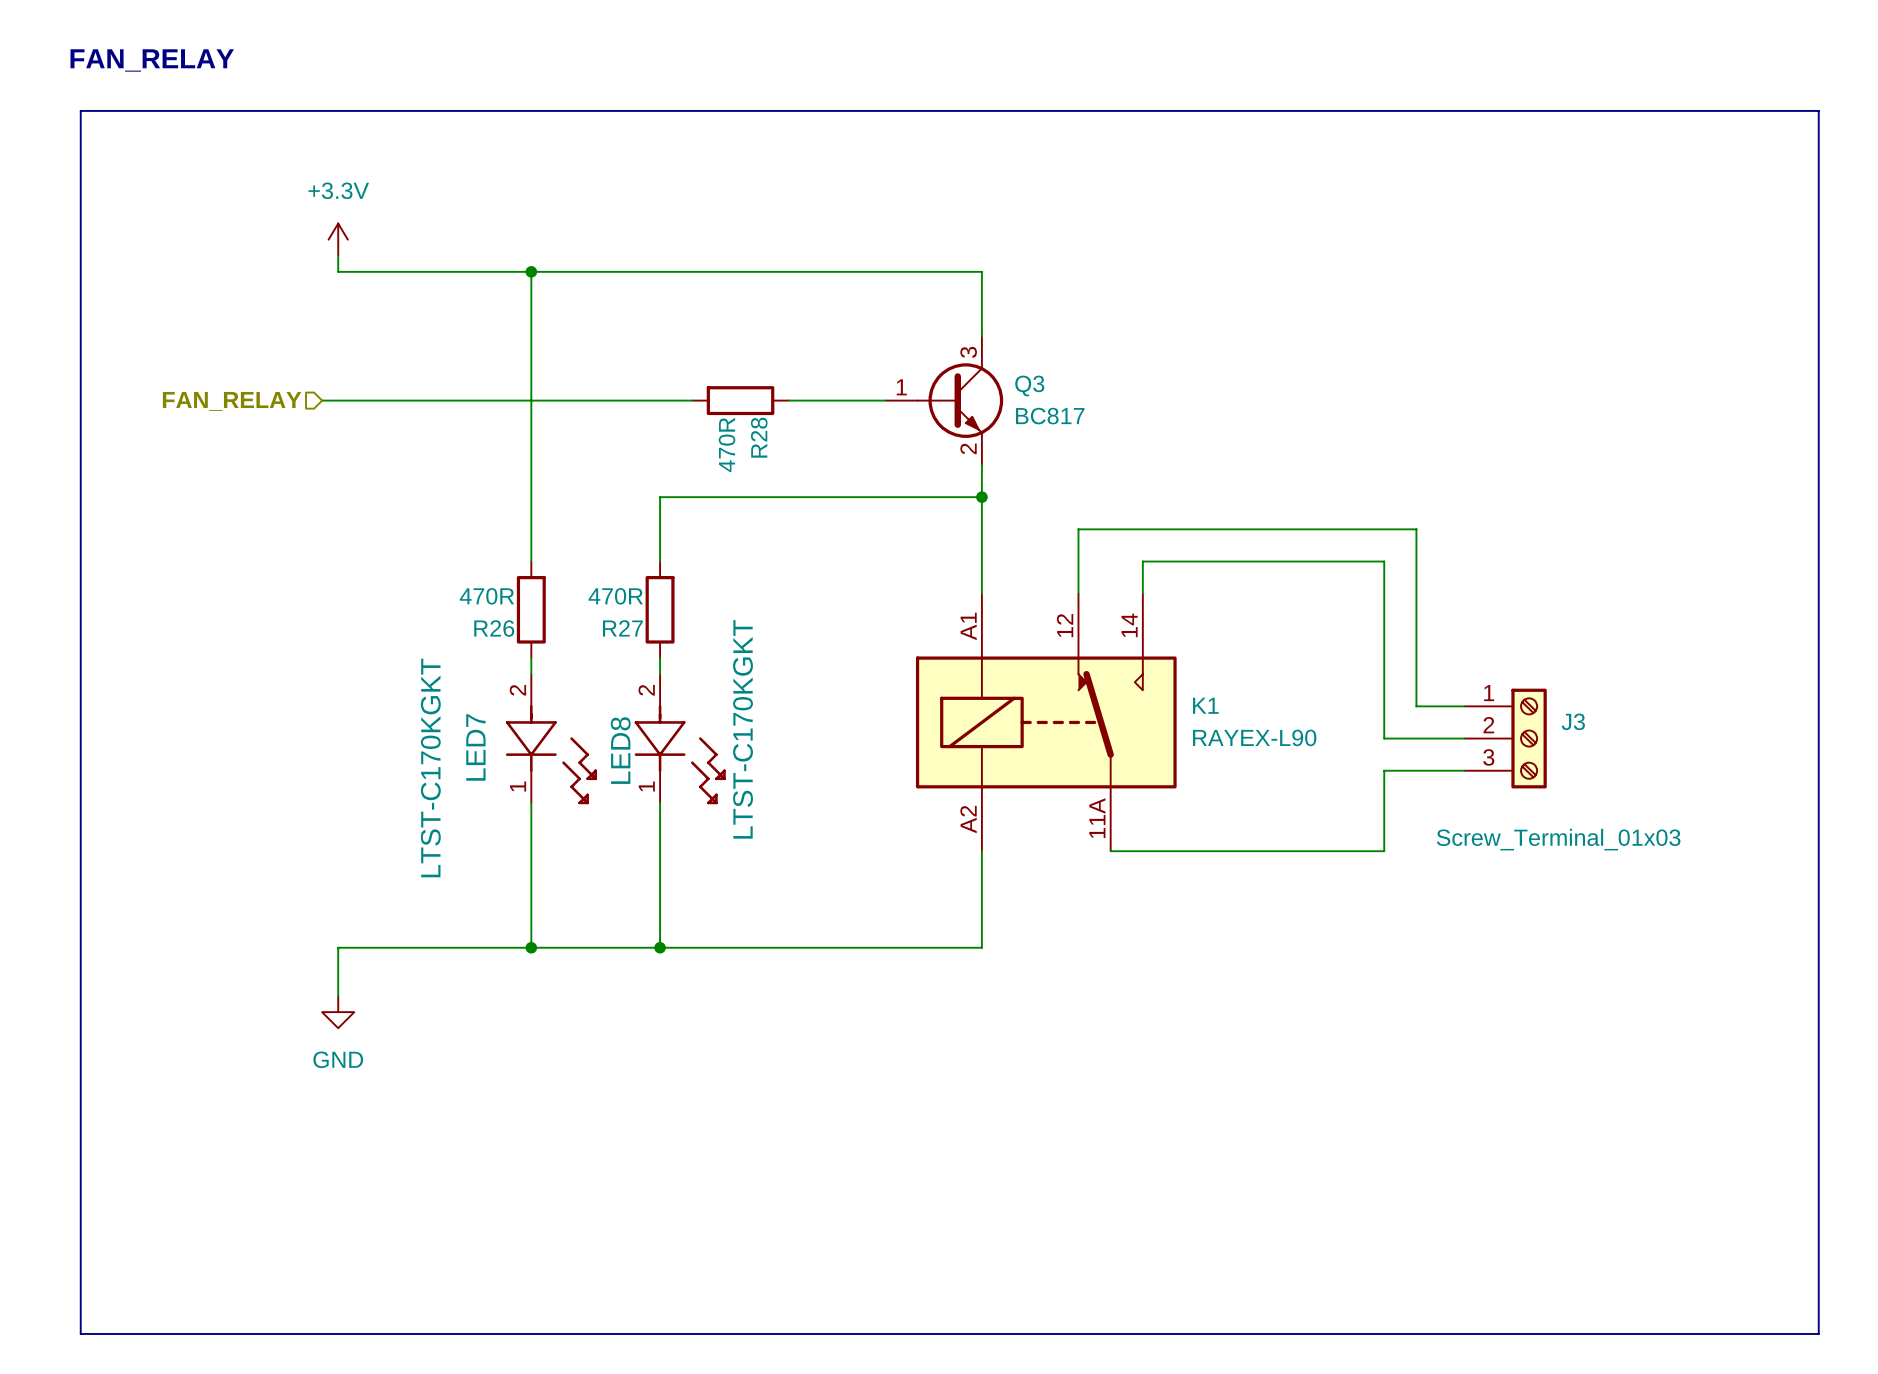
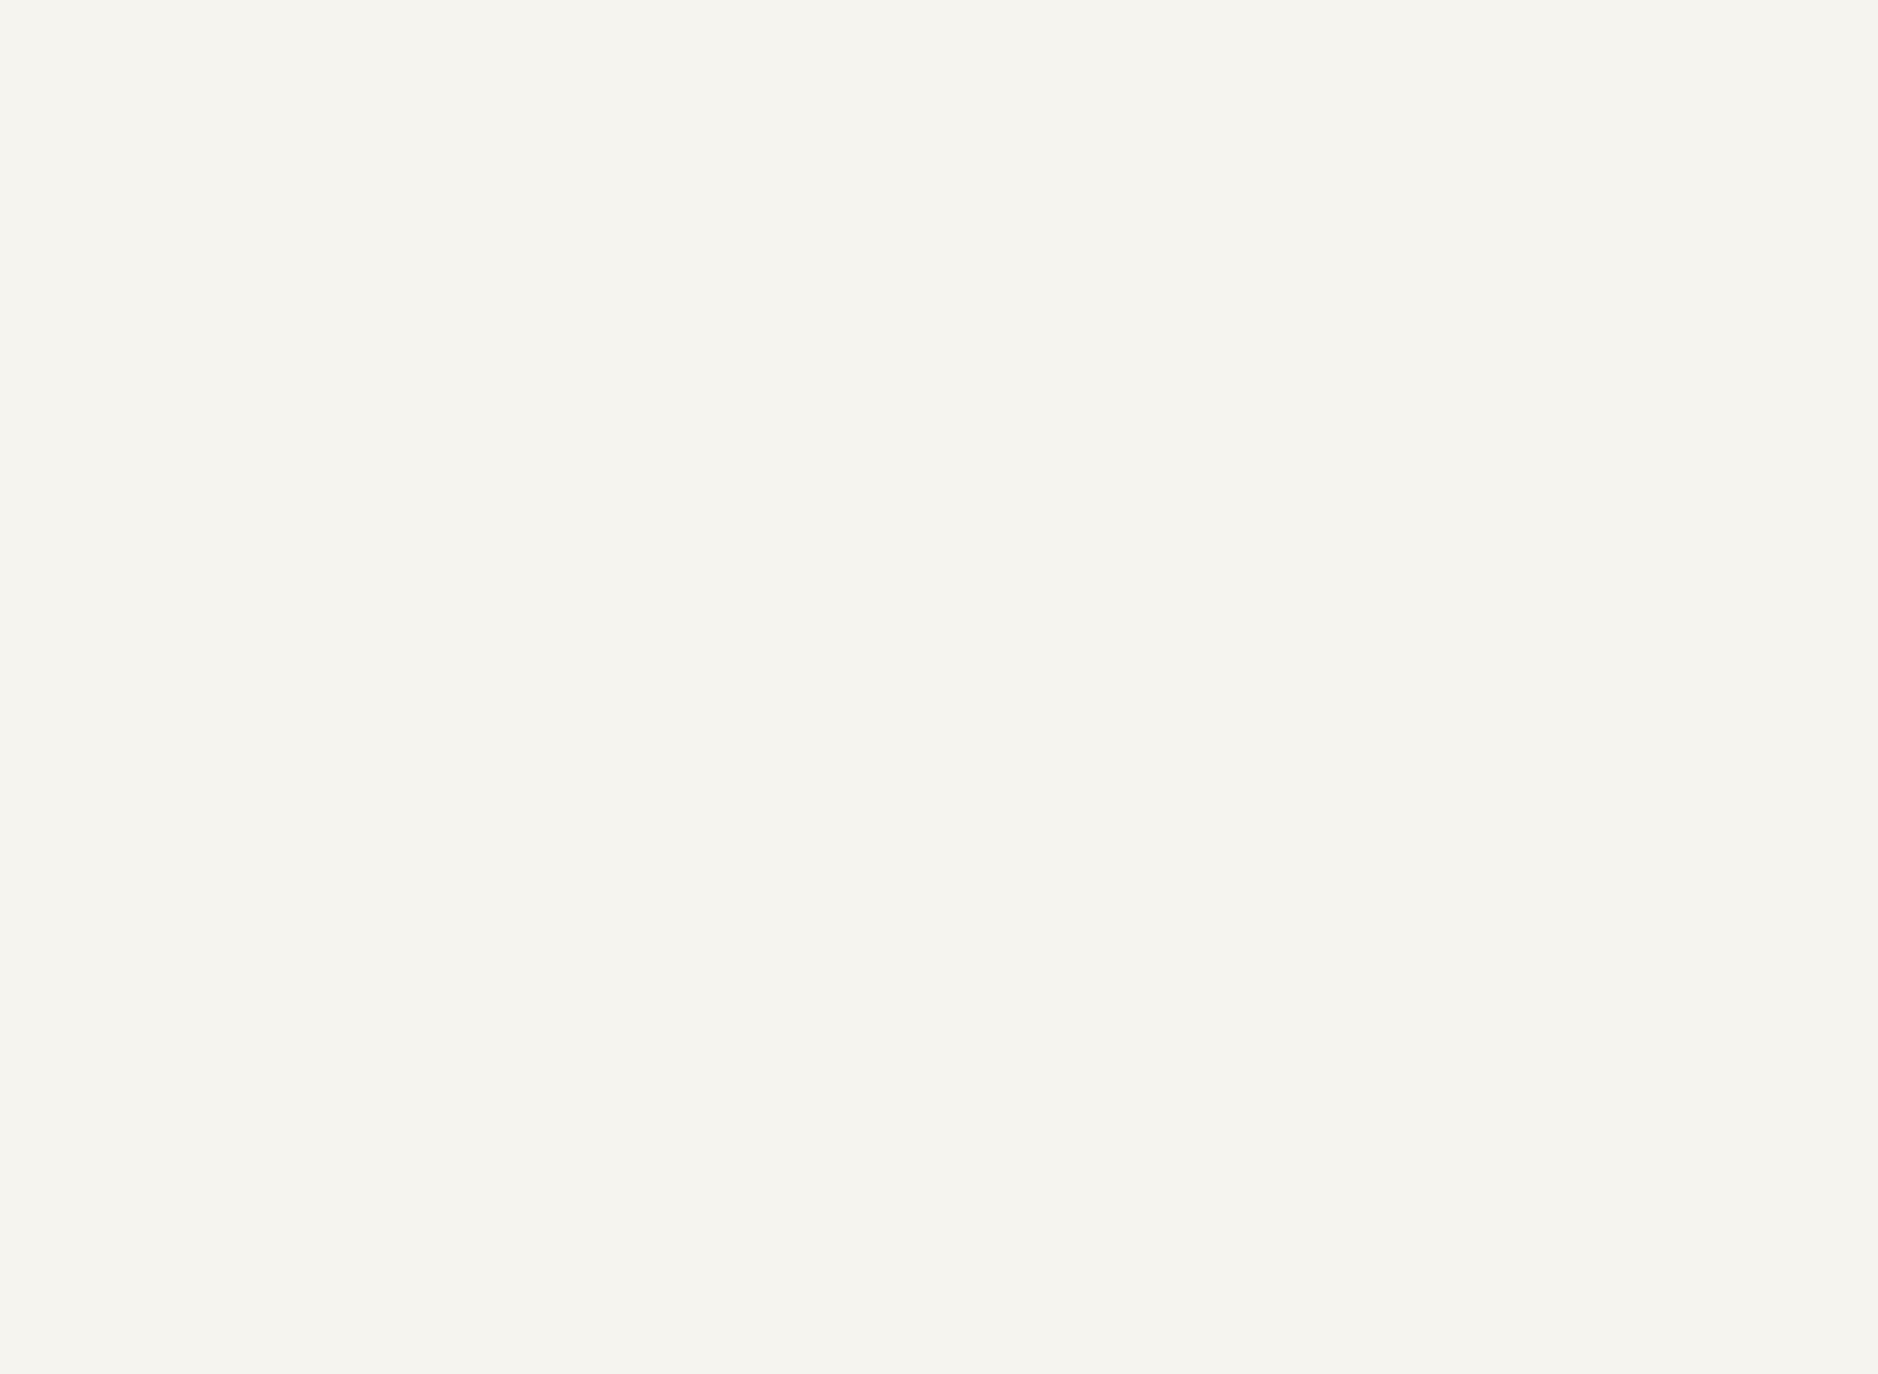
text: FAN_RELAY (152, 60) -> none
line: (80, 110) (1818, 110) (1818, 1333) (80, 1333) (80, 110) -> none
power symbol: +3.3V (338, 239) -> none
wire: (338, 255) (338, 271) (981, 271) (981, 336) -> none
wire: (531, 271) (531, 561) -> none
junction: (531, 271) -> none
wire: (322, 400) (692, 400) -> none
R28: 470R (740, 400) -> none
wire: (788, 400) (885, 400) -> none
Q3: BC817 (944, 400) -> none
hierarchical label: FAN_RELAY (232, 401) -> none
wire: (981, 464) (981, 593) -> none
wire: (981, 497) (660, 497) (660, 561) -> none
junction: (981, 497) -> none
wire: (1078, 593) (1078, 529) (1416, 529) (1416, 706) (1464, 706) -> none
wire: (1142, 593) (1142, 561) (1384, 561) (1384, 738) (1464, 738) -> none
R26: 470R (531, 609) -> none
R27: 470R (660, 609) -> none
wire: (531, 658) (531, 674) -> none
wire: (660, 658) (660, 674) -> none
K1: RAYEX-L90 (1046, 722) -> none
J3: Screw_Terminal_01x03 (1505, 738) -> none
LED7: LTST-C170KGKT (551, 739) -> none
LED8: LTST-C170KGKT (680, 739) -> none
wire: (1464, 770) (1384, 770) (1384, 851) (1110, 851) -> none
wire: (531, 802) (531, 947) -> none
wire: (660, 802) (660, 947) -> none
wire: (981, 851) (981, 947) (338, 947) (338, 996) -> none
junction: (531, 947) -> none
junction: (660, 947) -> none
power symbol: GND (338, 1012) -> none

